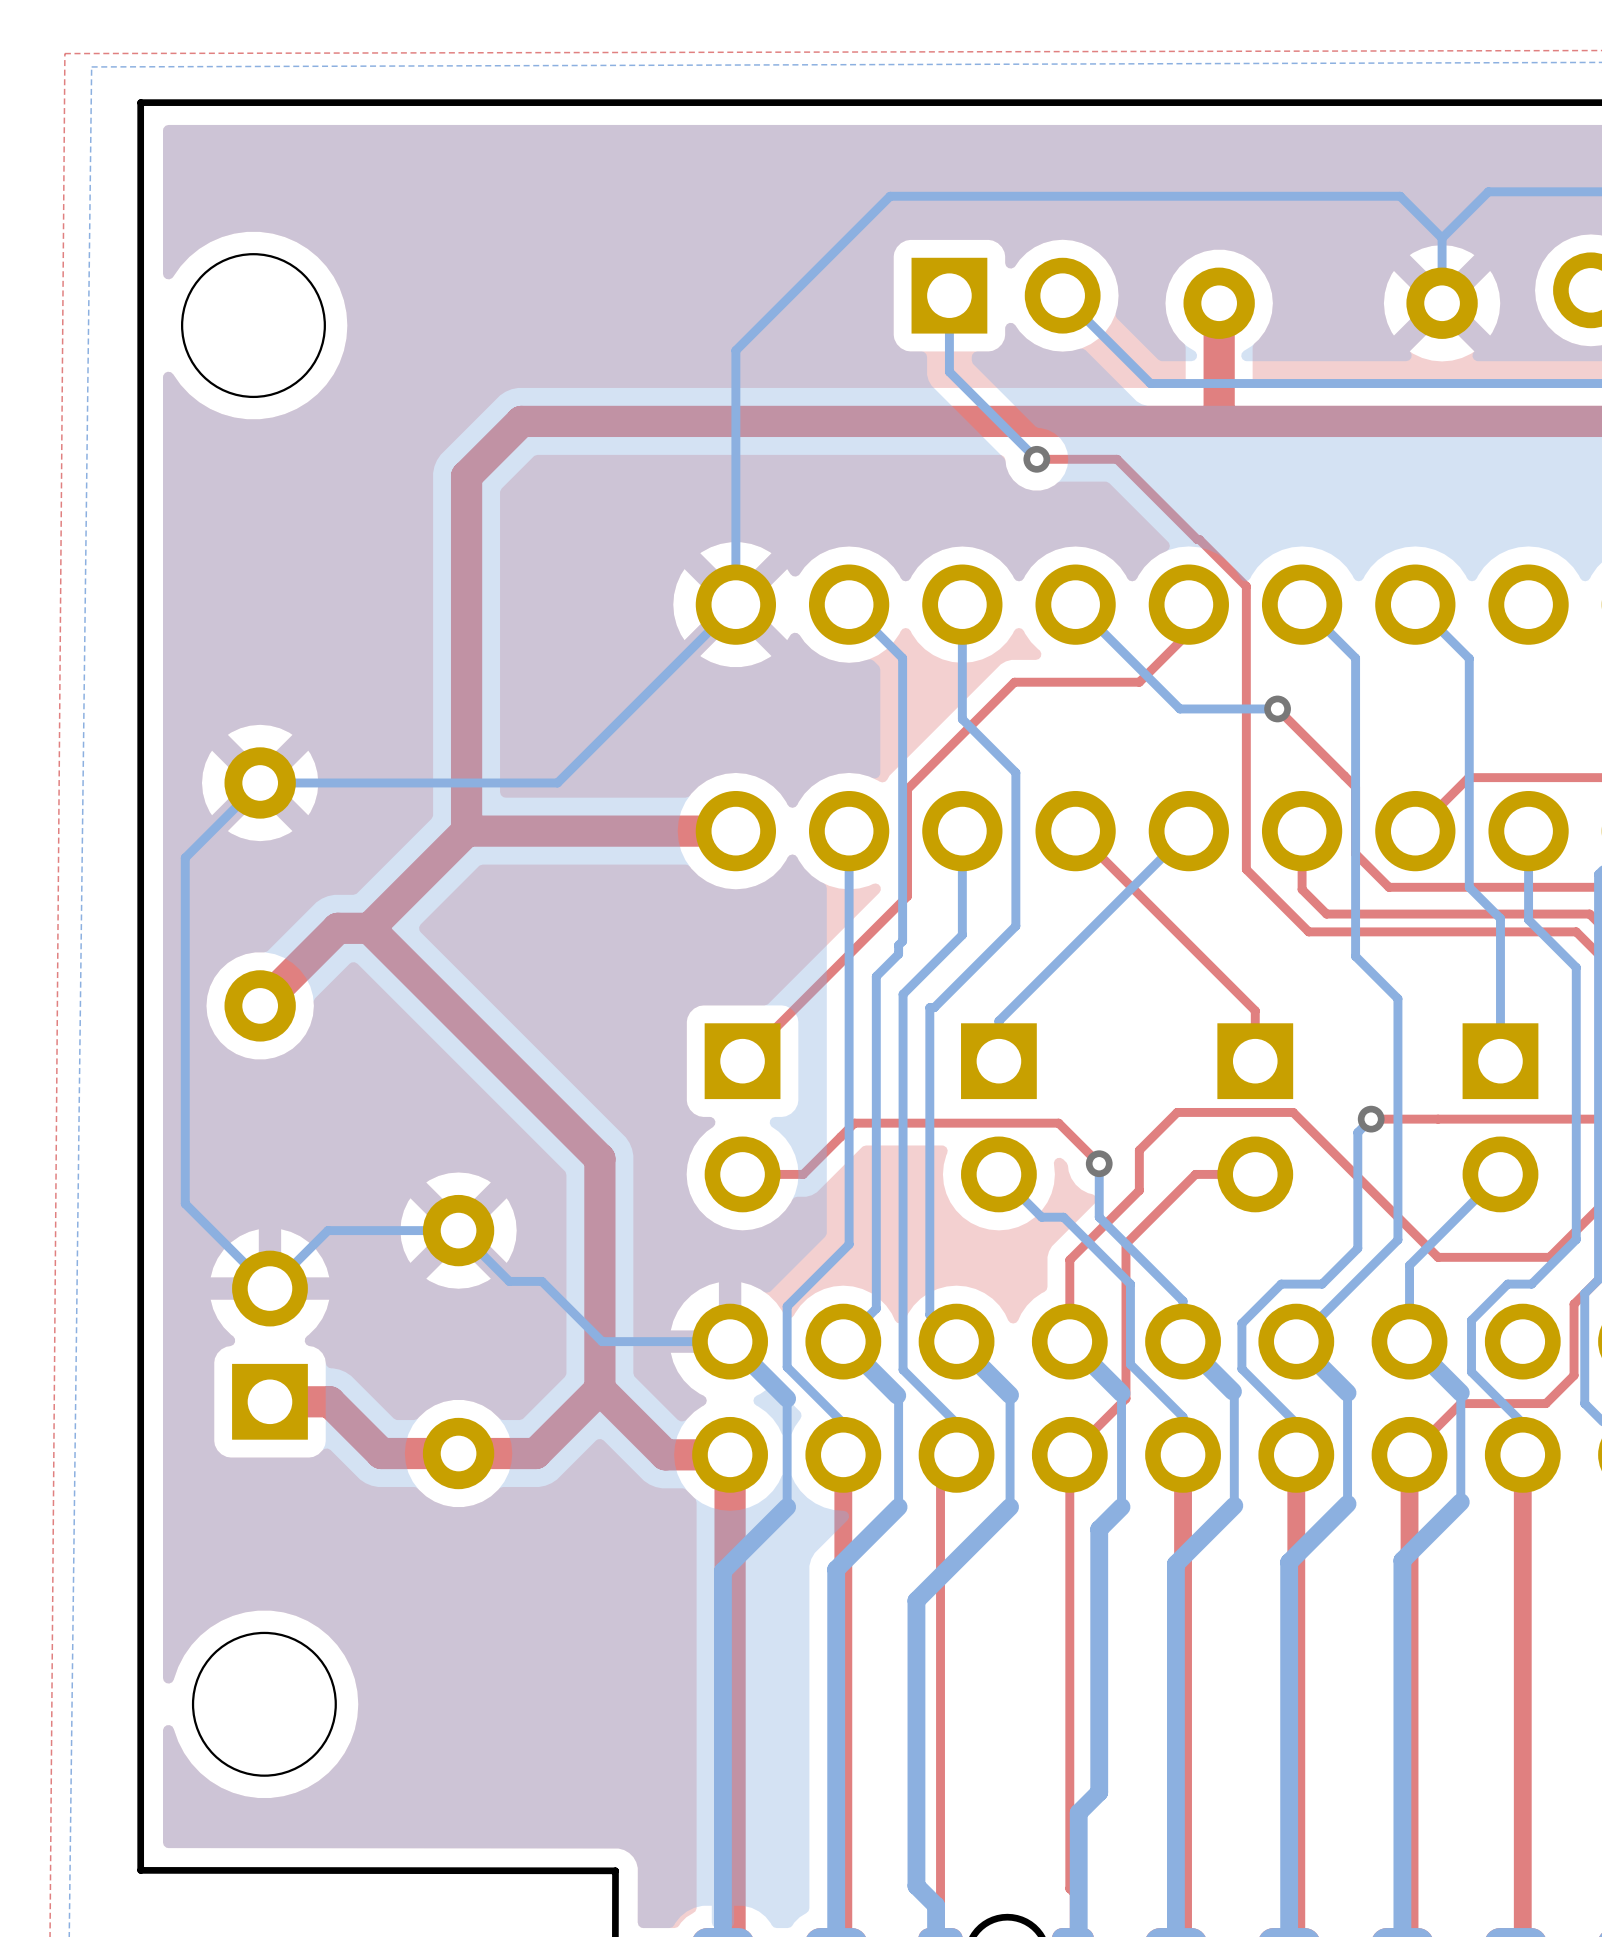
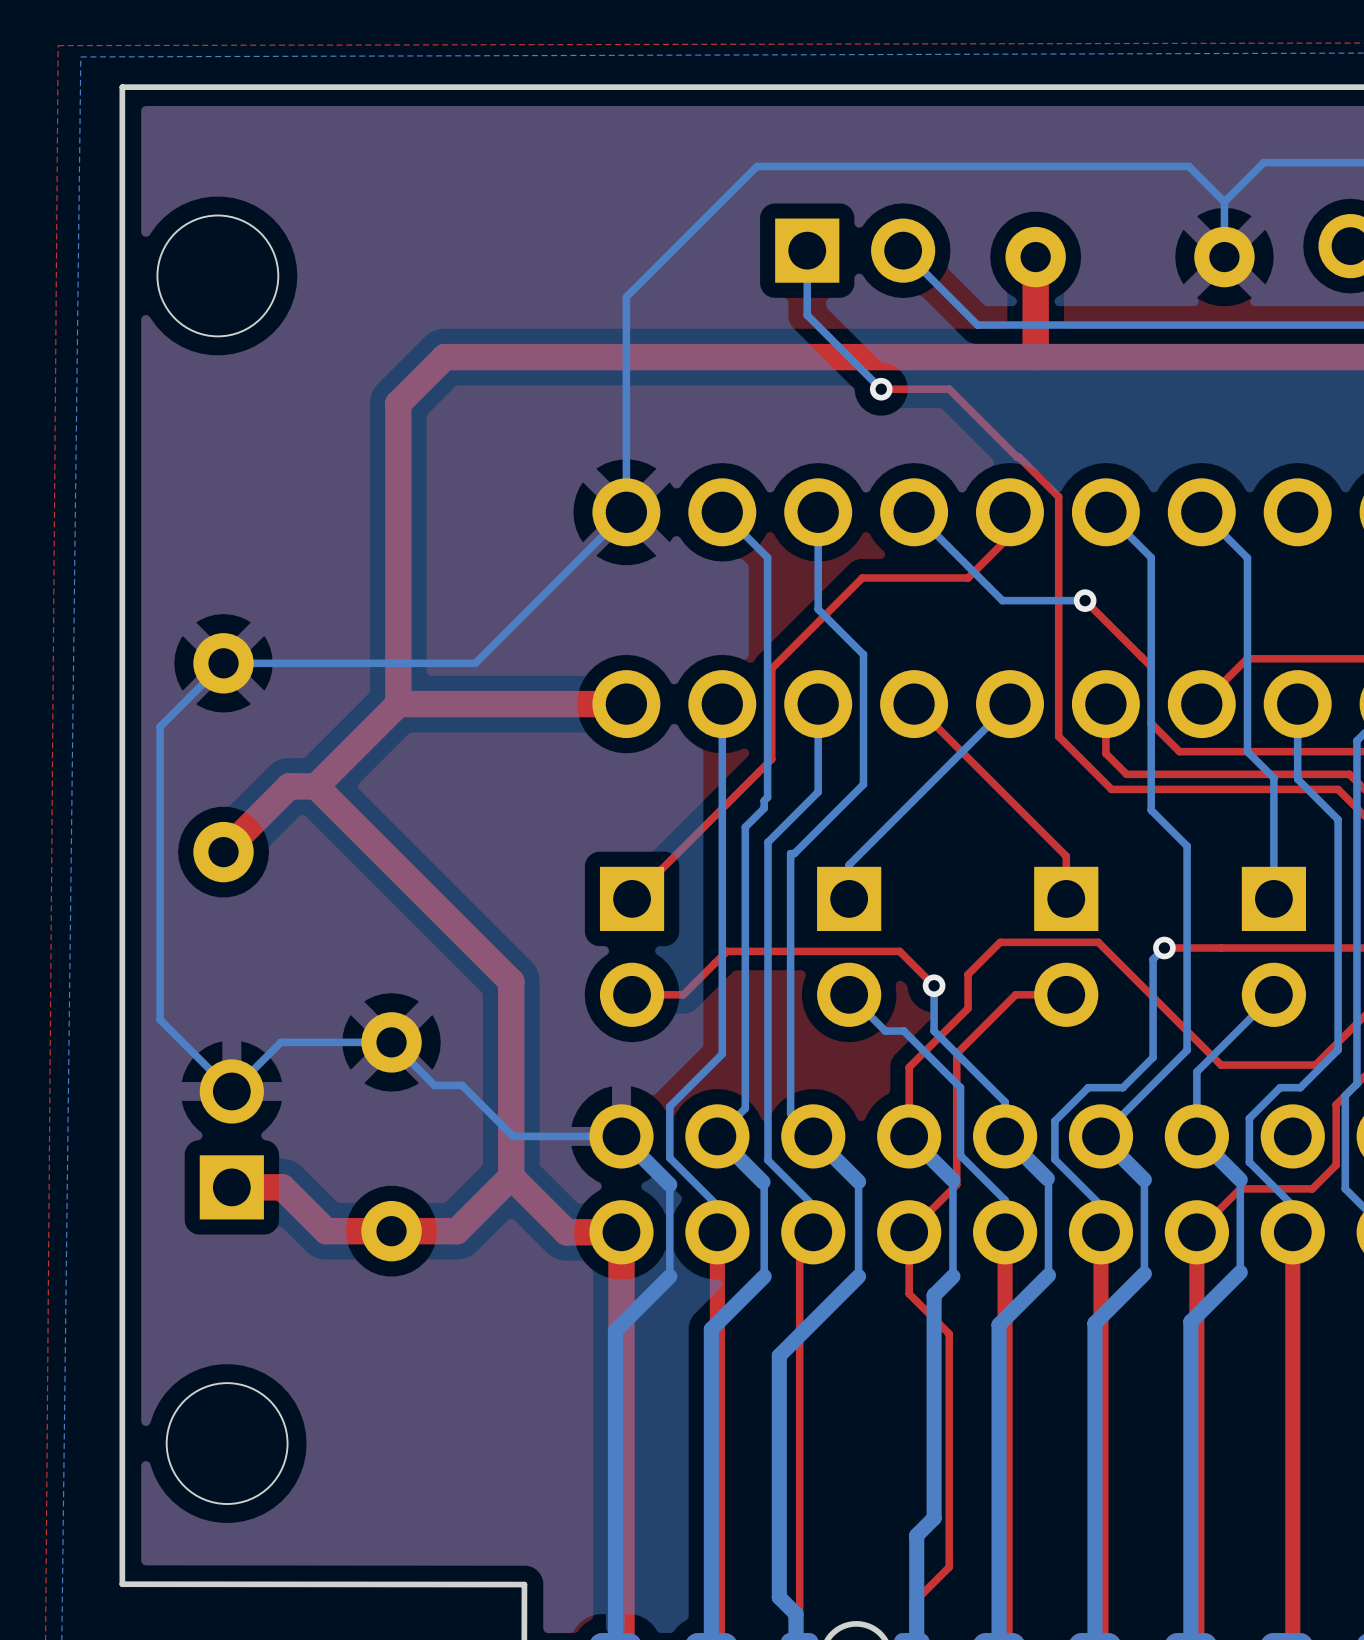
top track: (1069, 1527) (1069, 1888) (1074, 1893) -> (909, 1293) (949, 1333) (949, 1567) (912, 1603)

